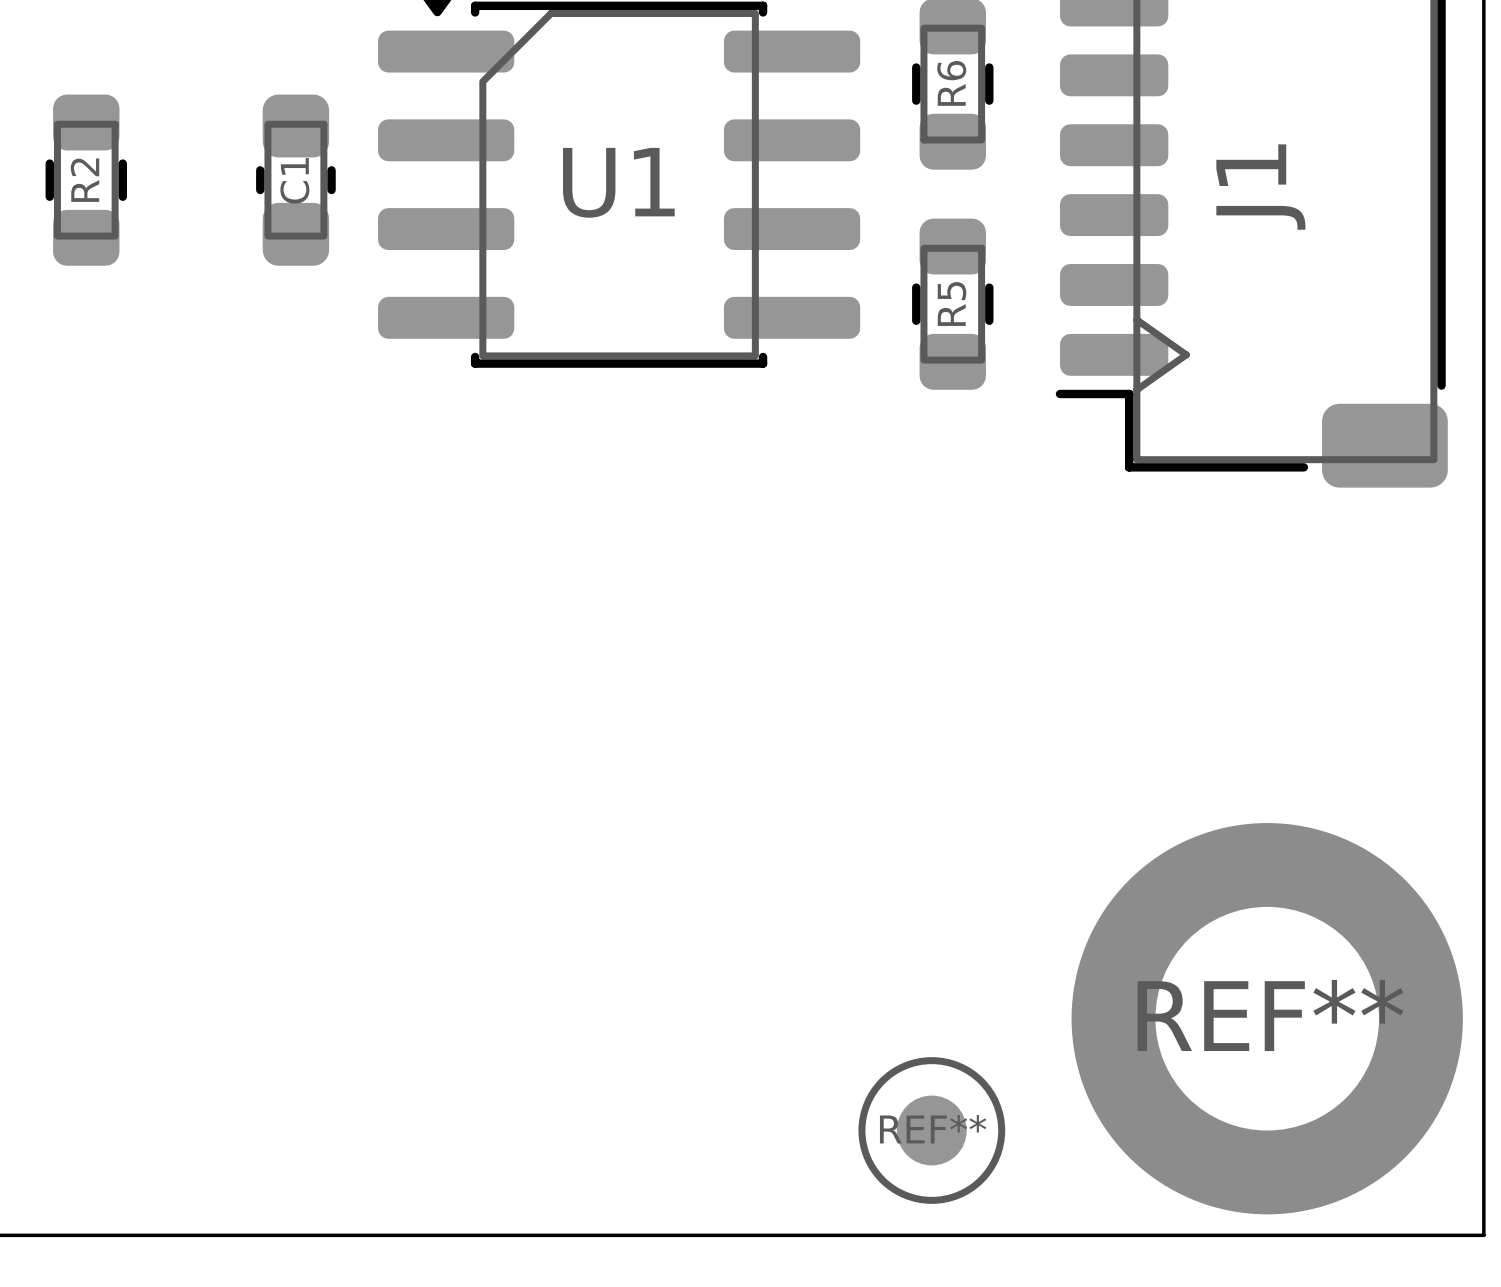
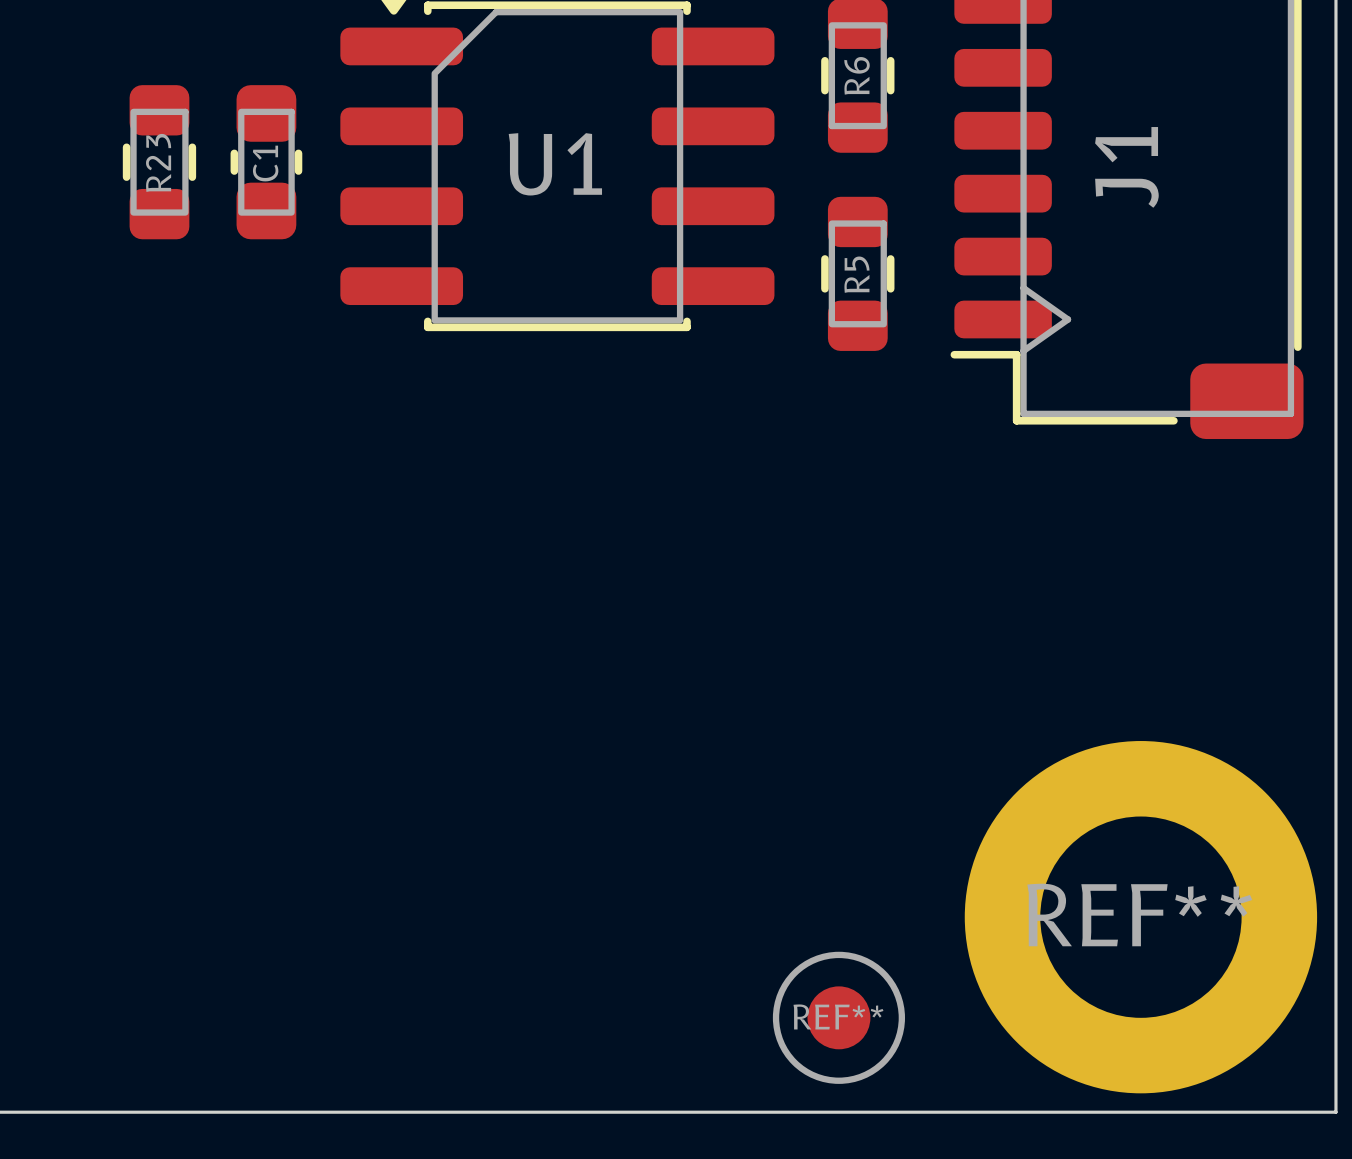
R2: (86, 180) -> none
R23: none -> (159, 162)

